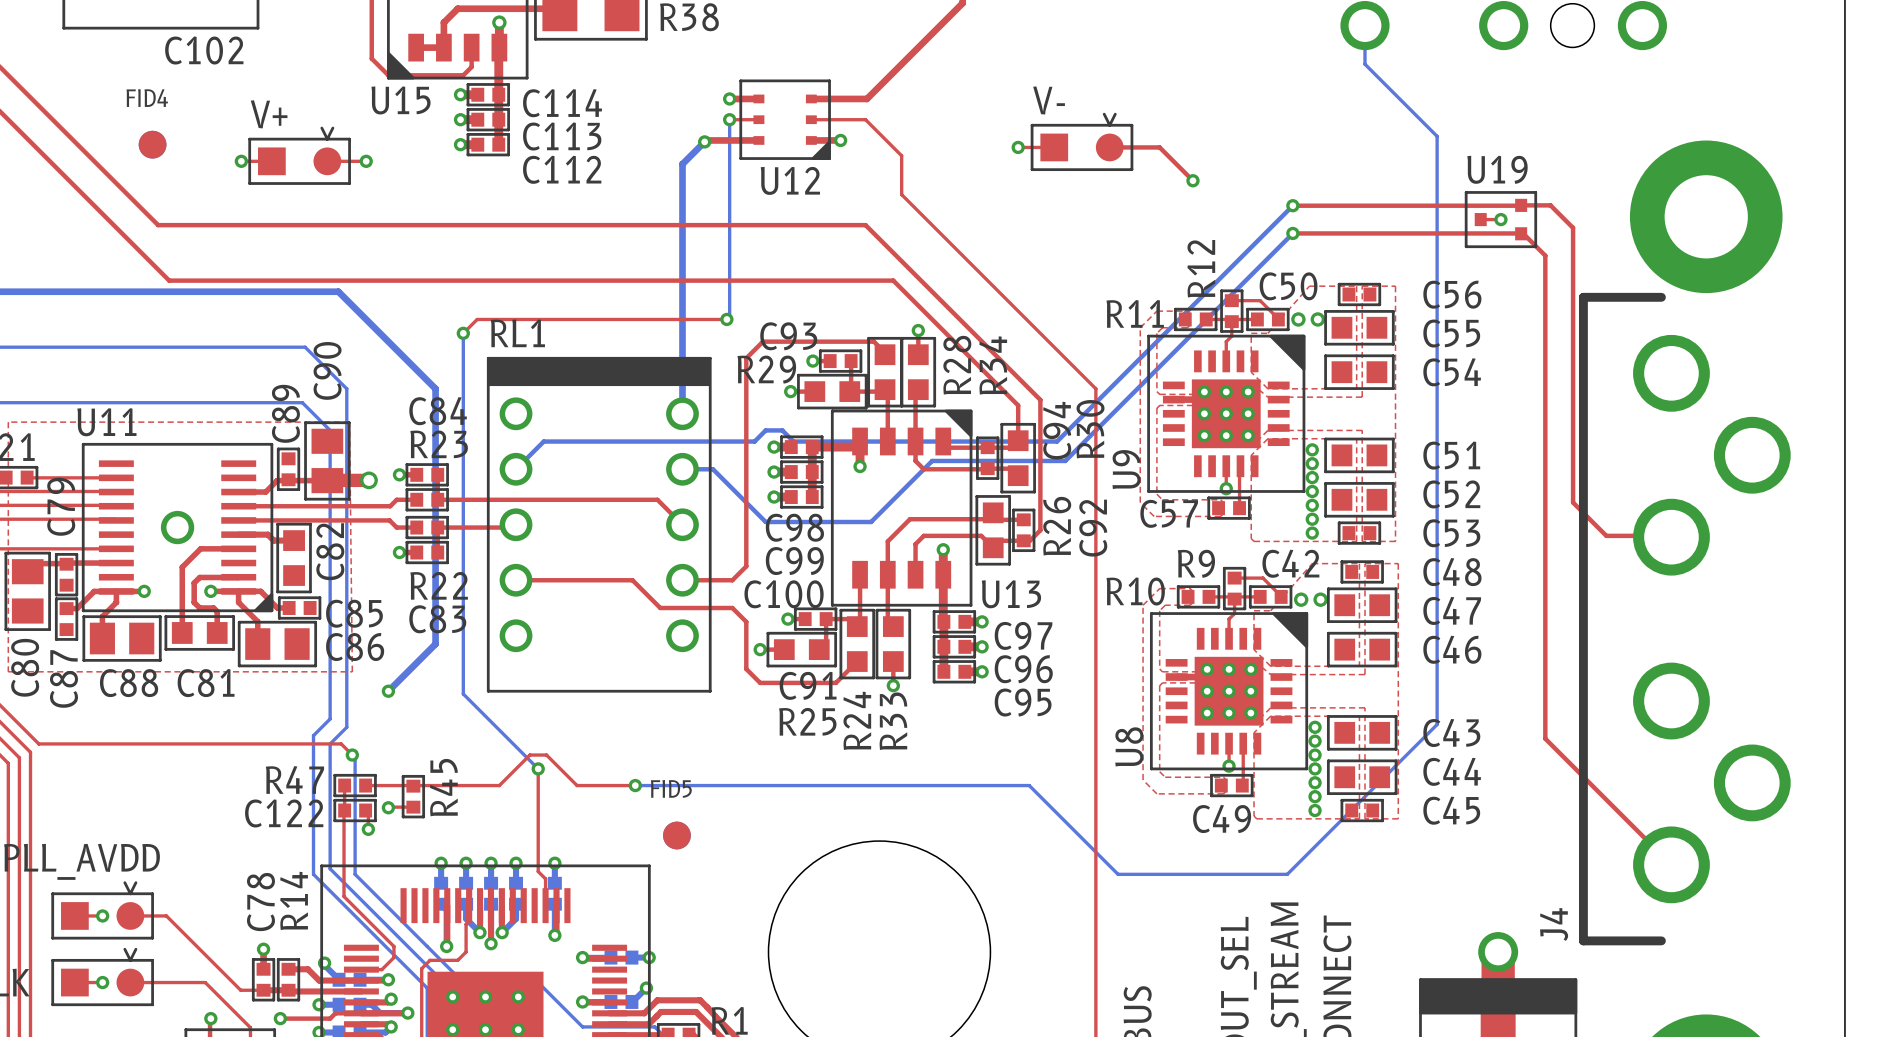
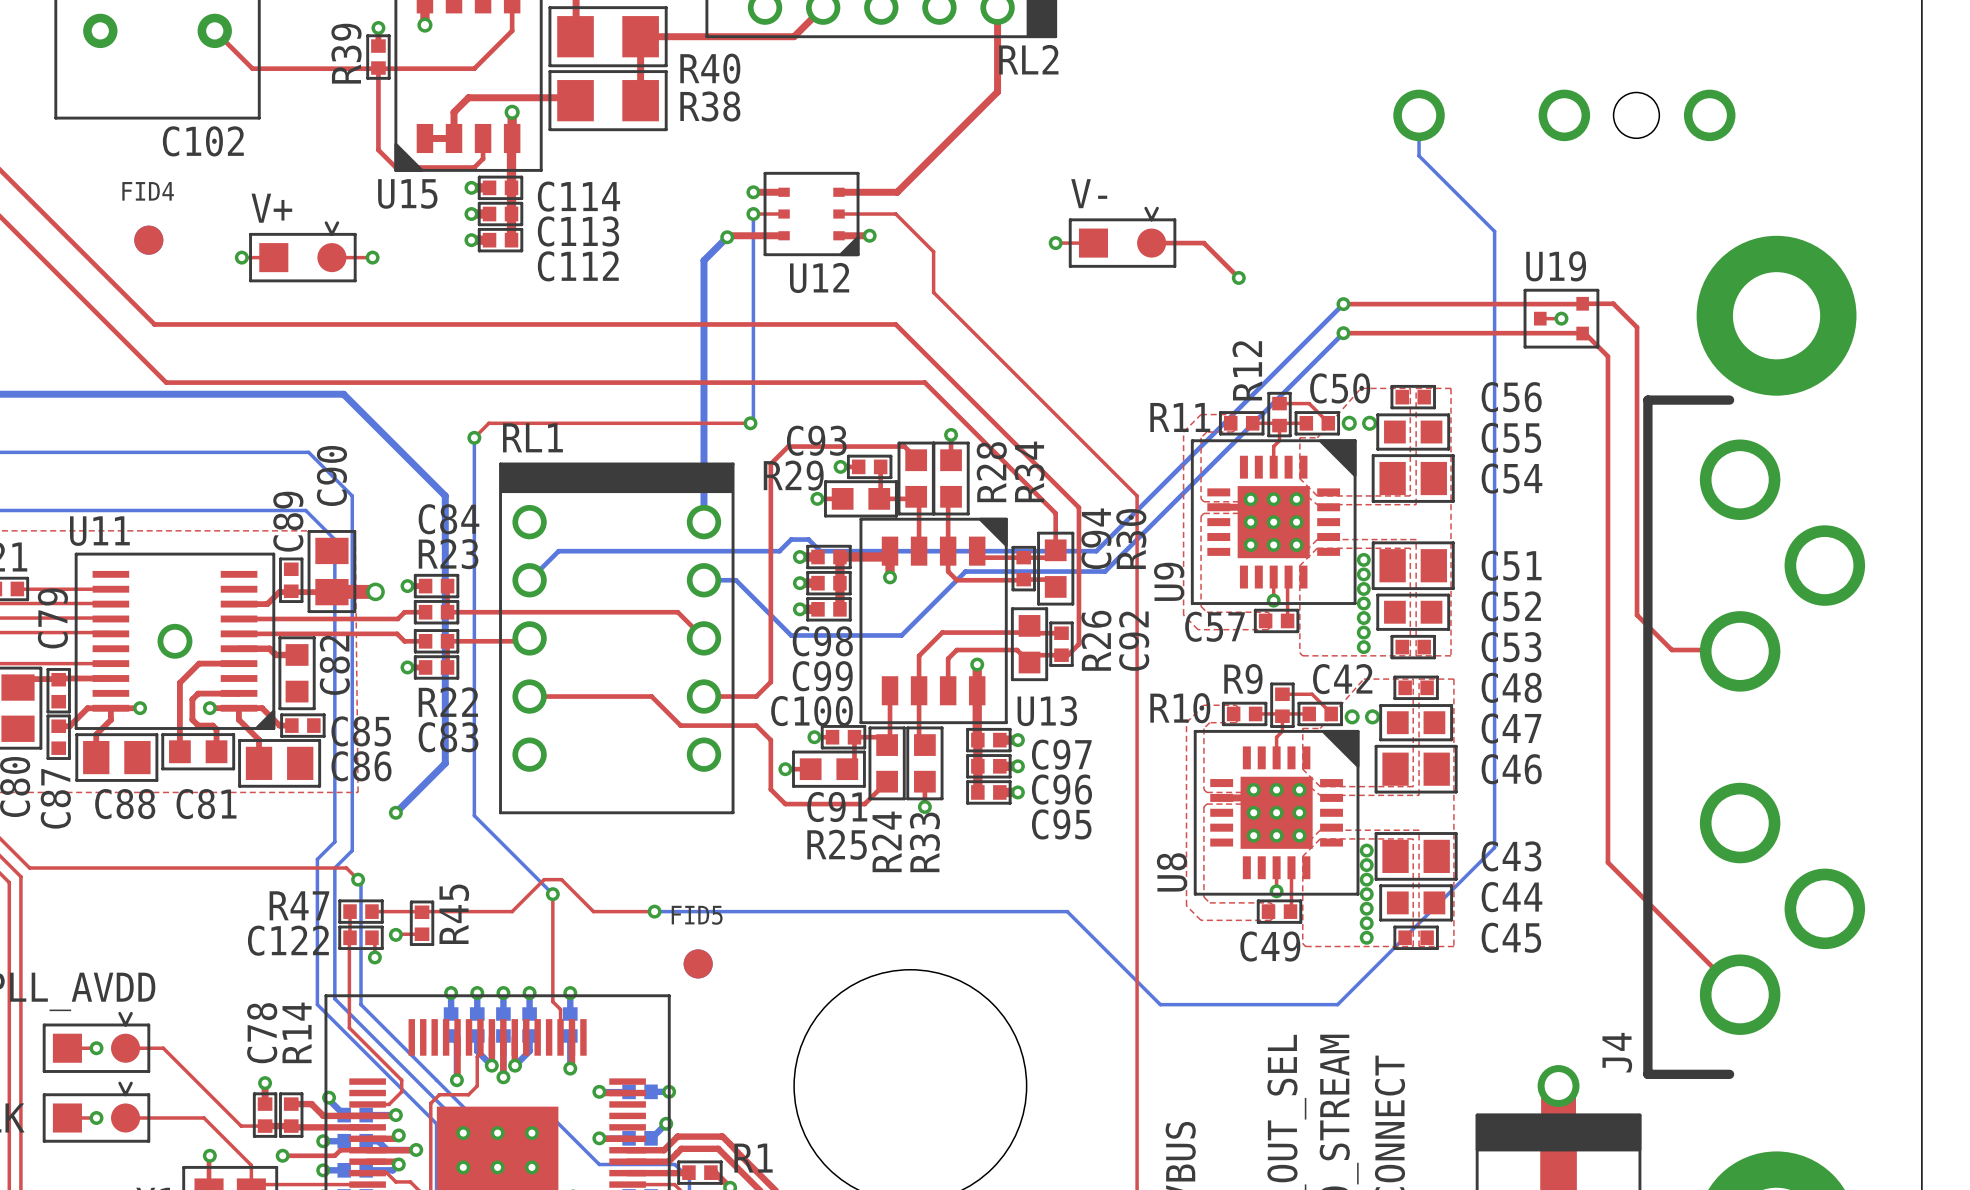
C54 footprint: [1324, 354, 1395, 390] -> [1371, 454, 1455, 503]
C51 footprint: [1324, 437, 1395, 474] -> [1371, 541, 1455, 591]
C46 footprint: [1326, 631, 1398, 668] -> [1374, 744, 1458, 794]
C43 footprint: [1326, 715, 1398, 751] -> [1374, 832, 1458, 881]

